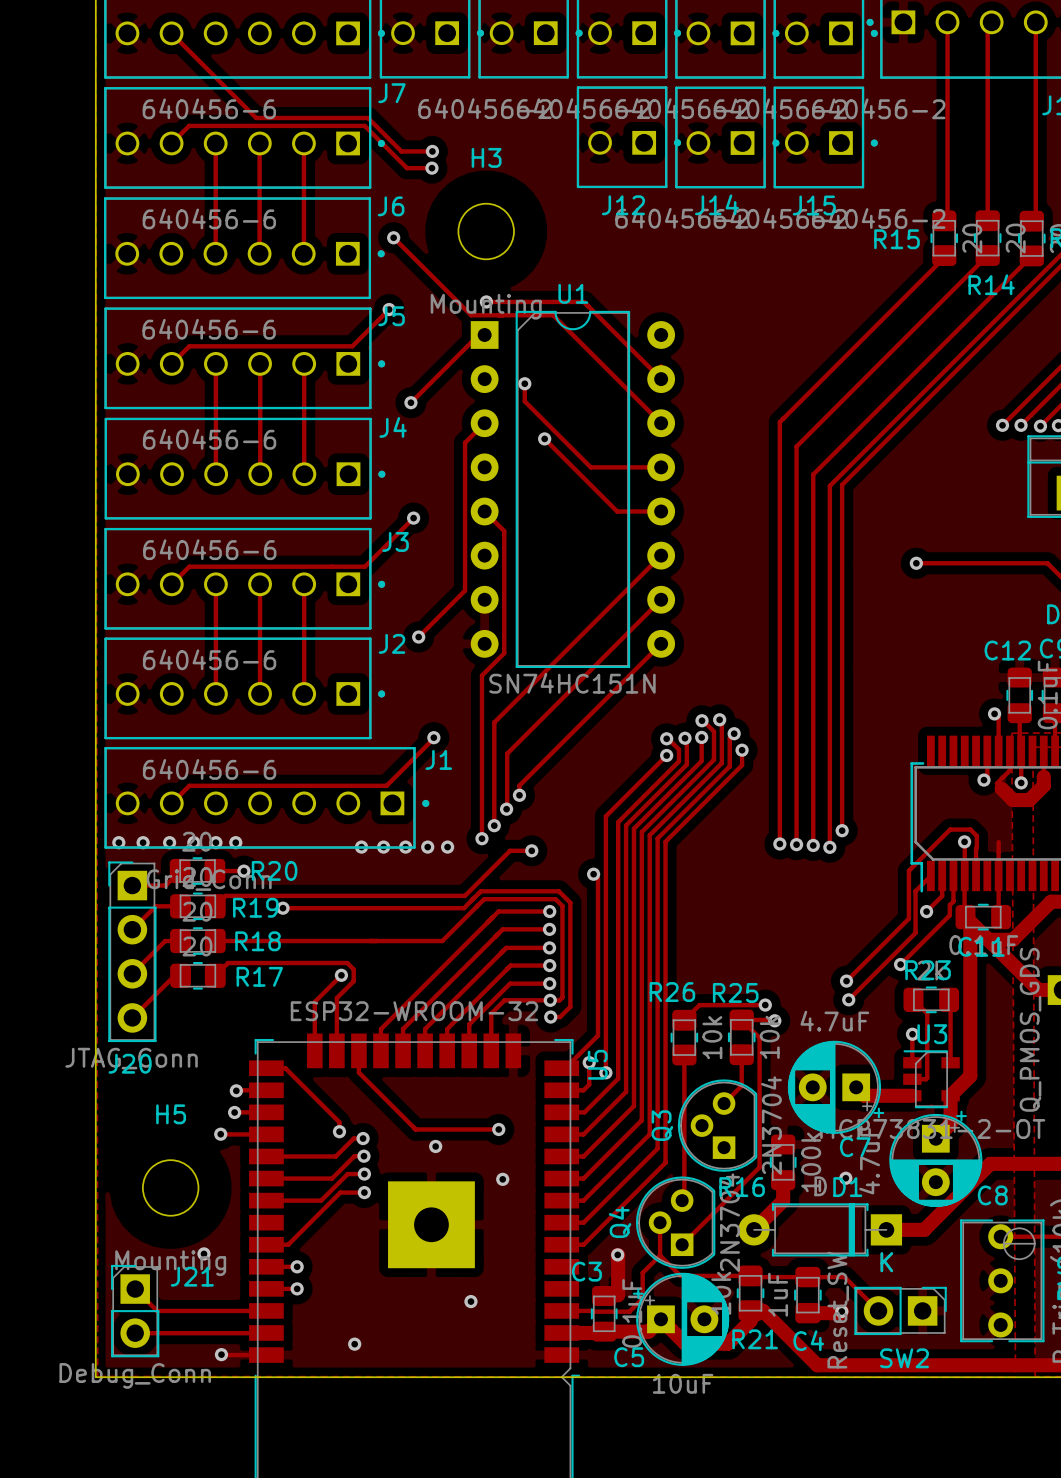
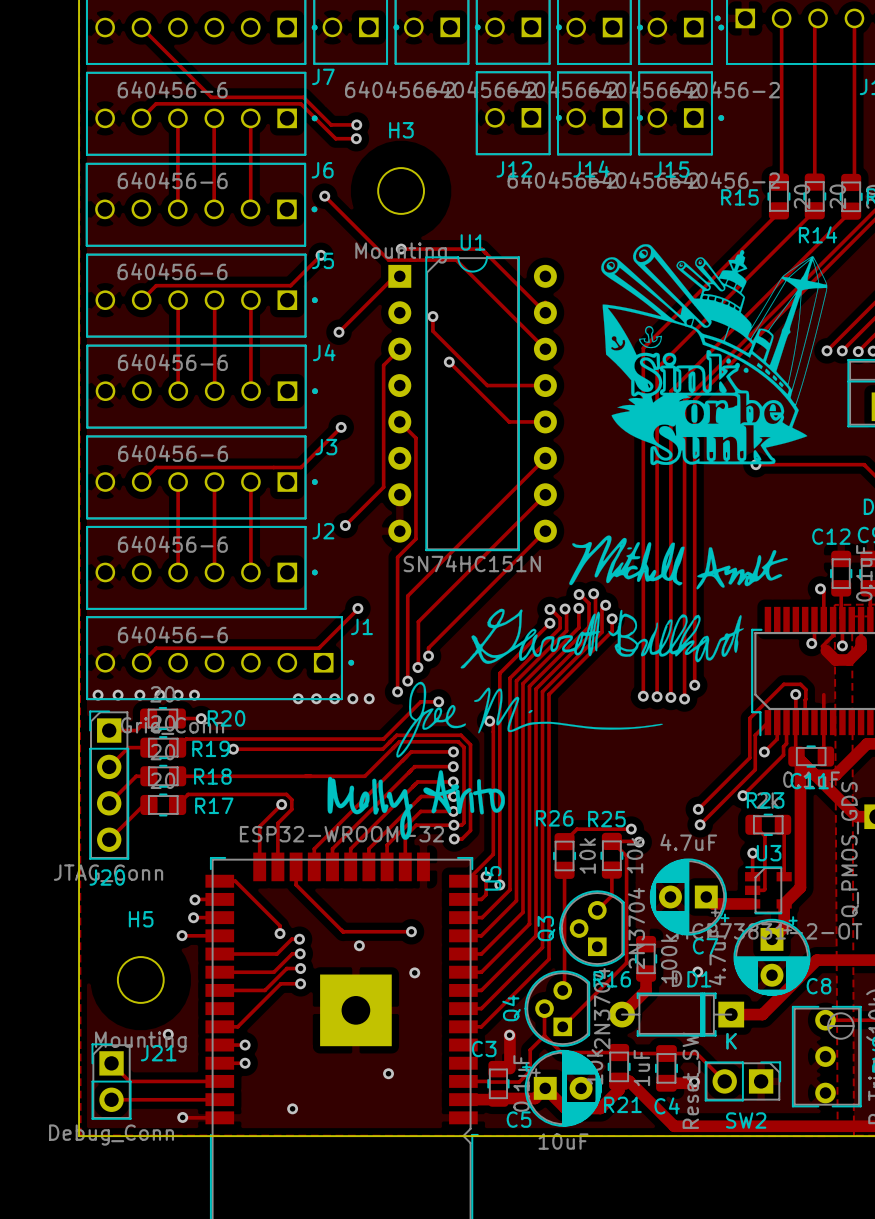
drawing: none -> [601, 244, 828, 466]
drawing: none -> [569, 535, 788, 590]
drawing: none -> [327, 608, 744, 840]

